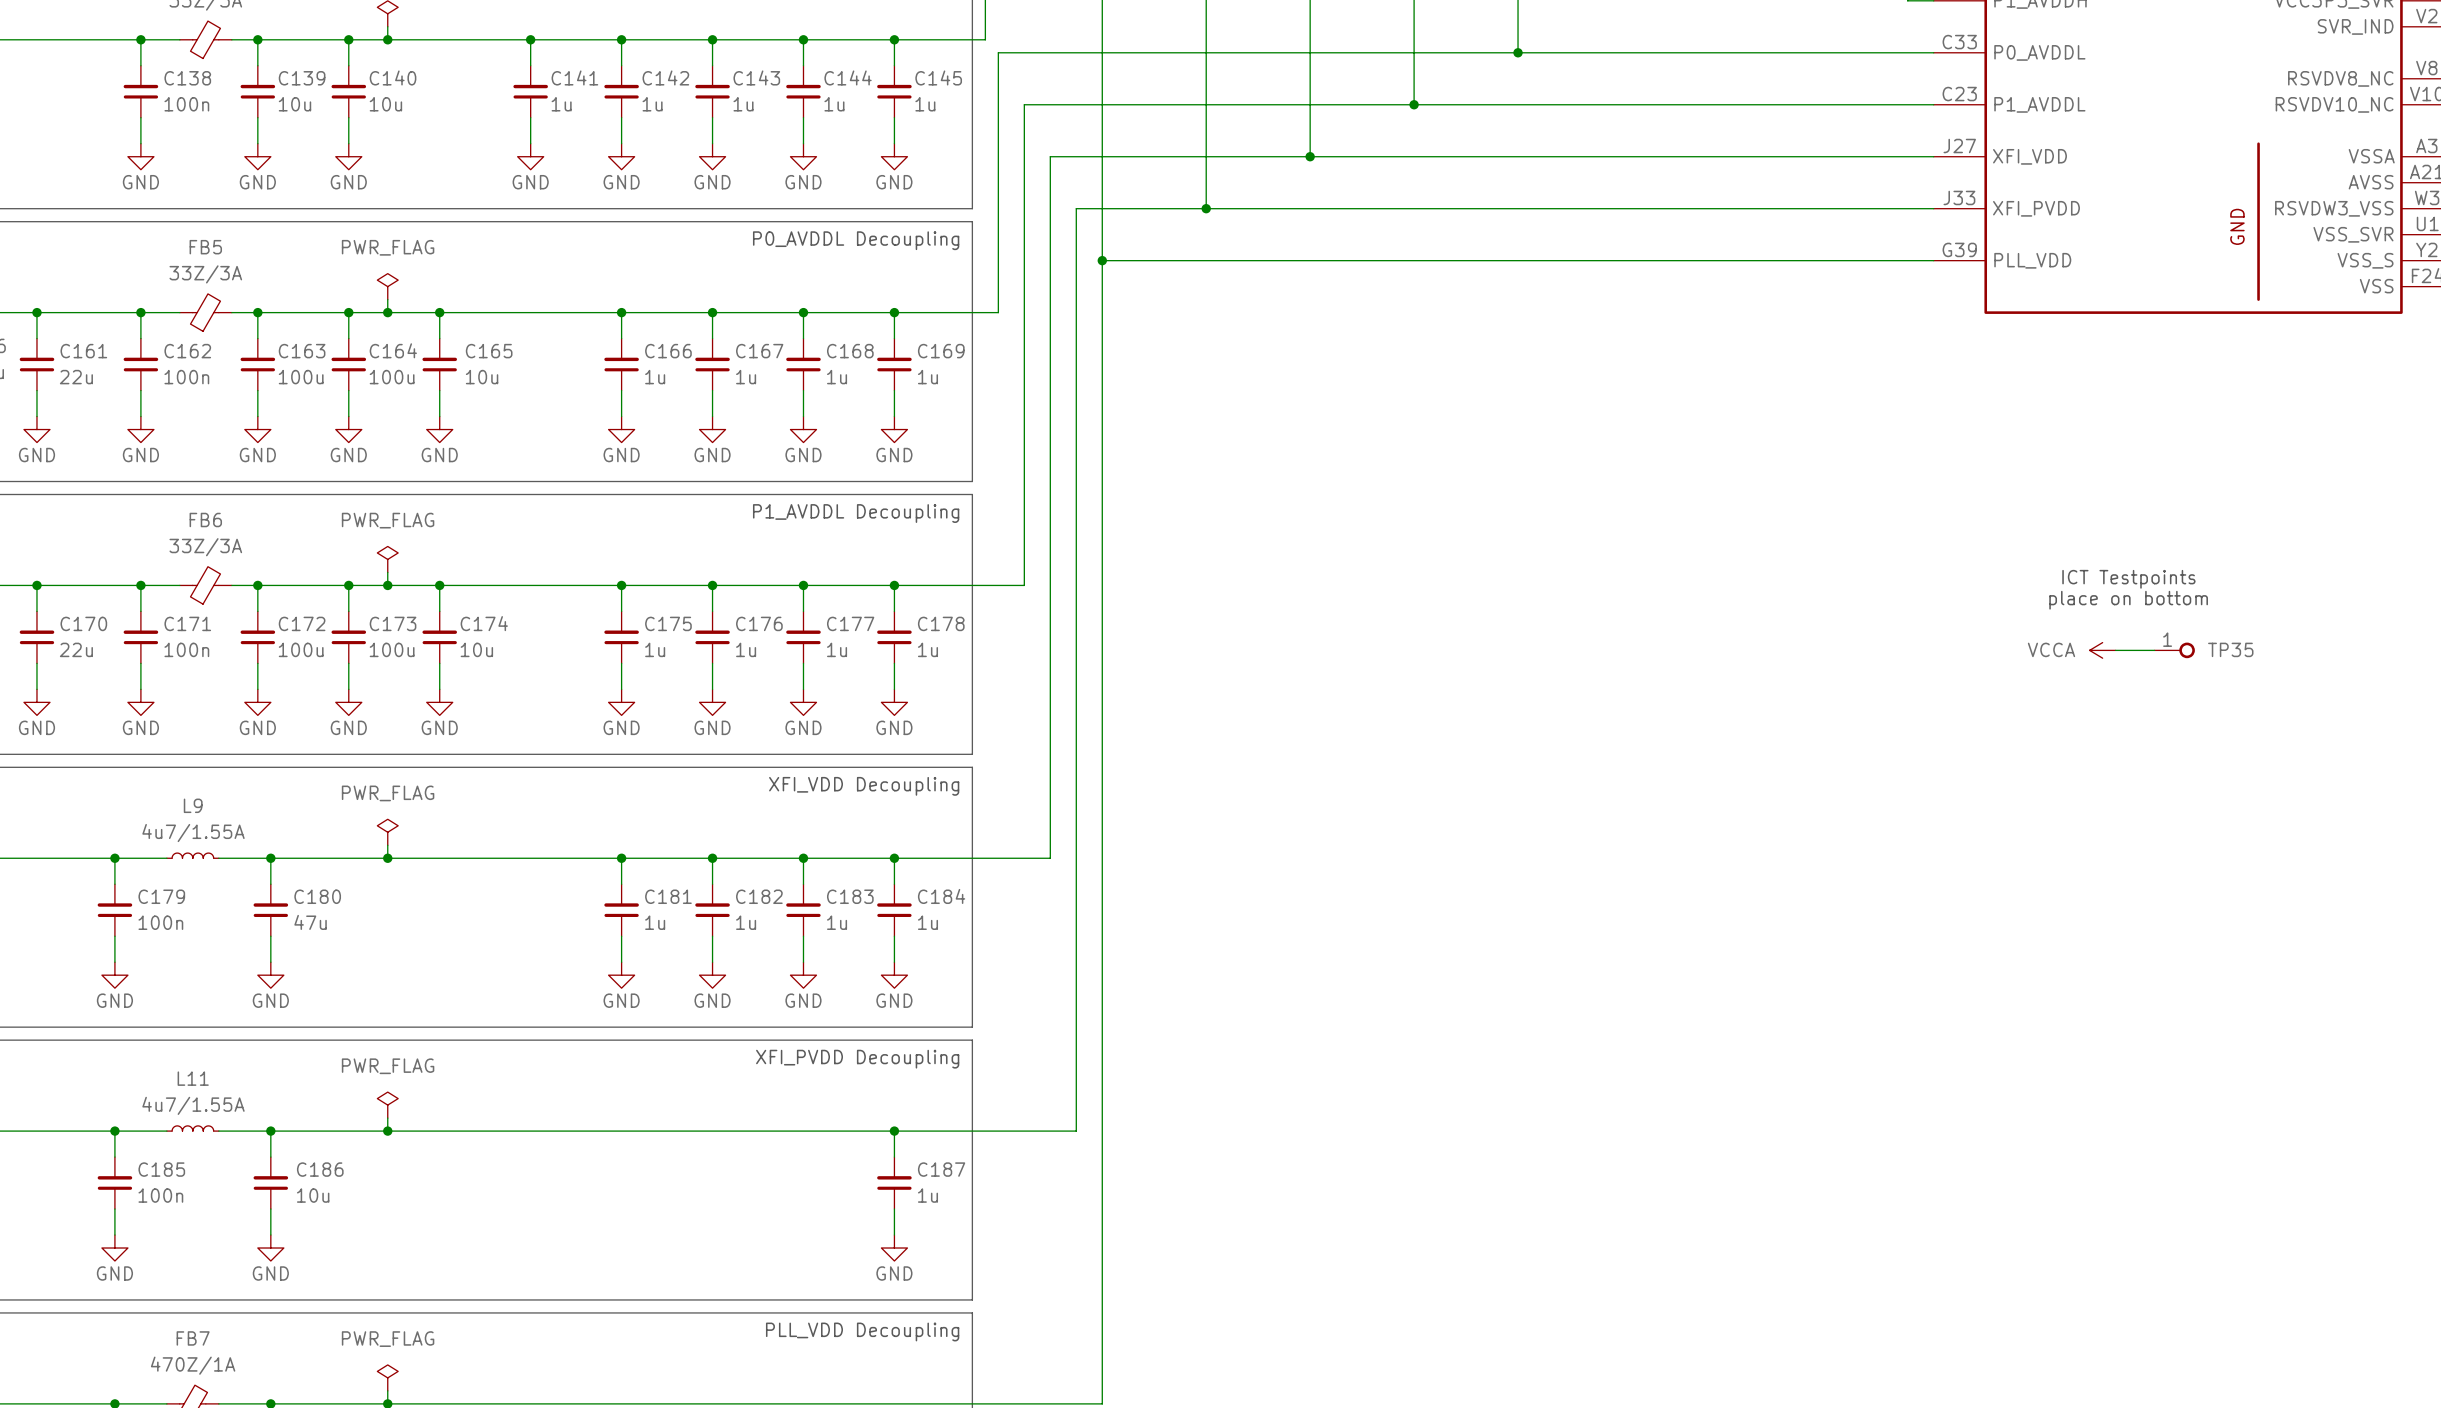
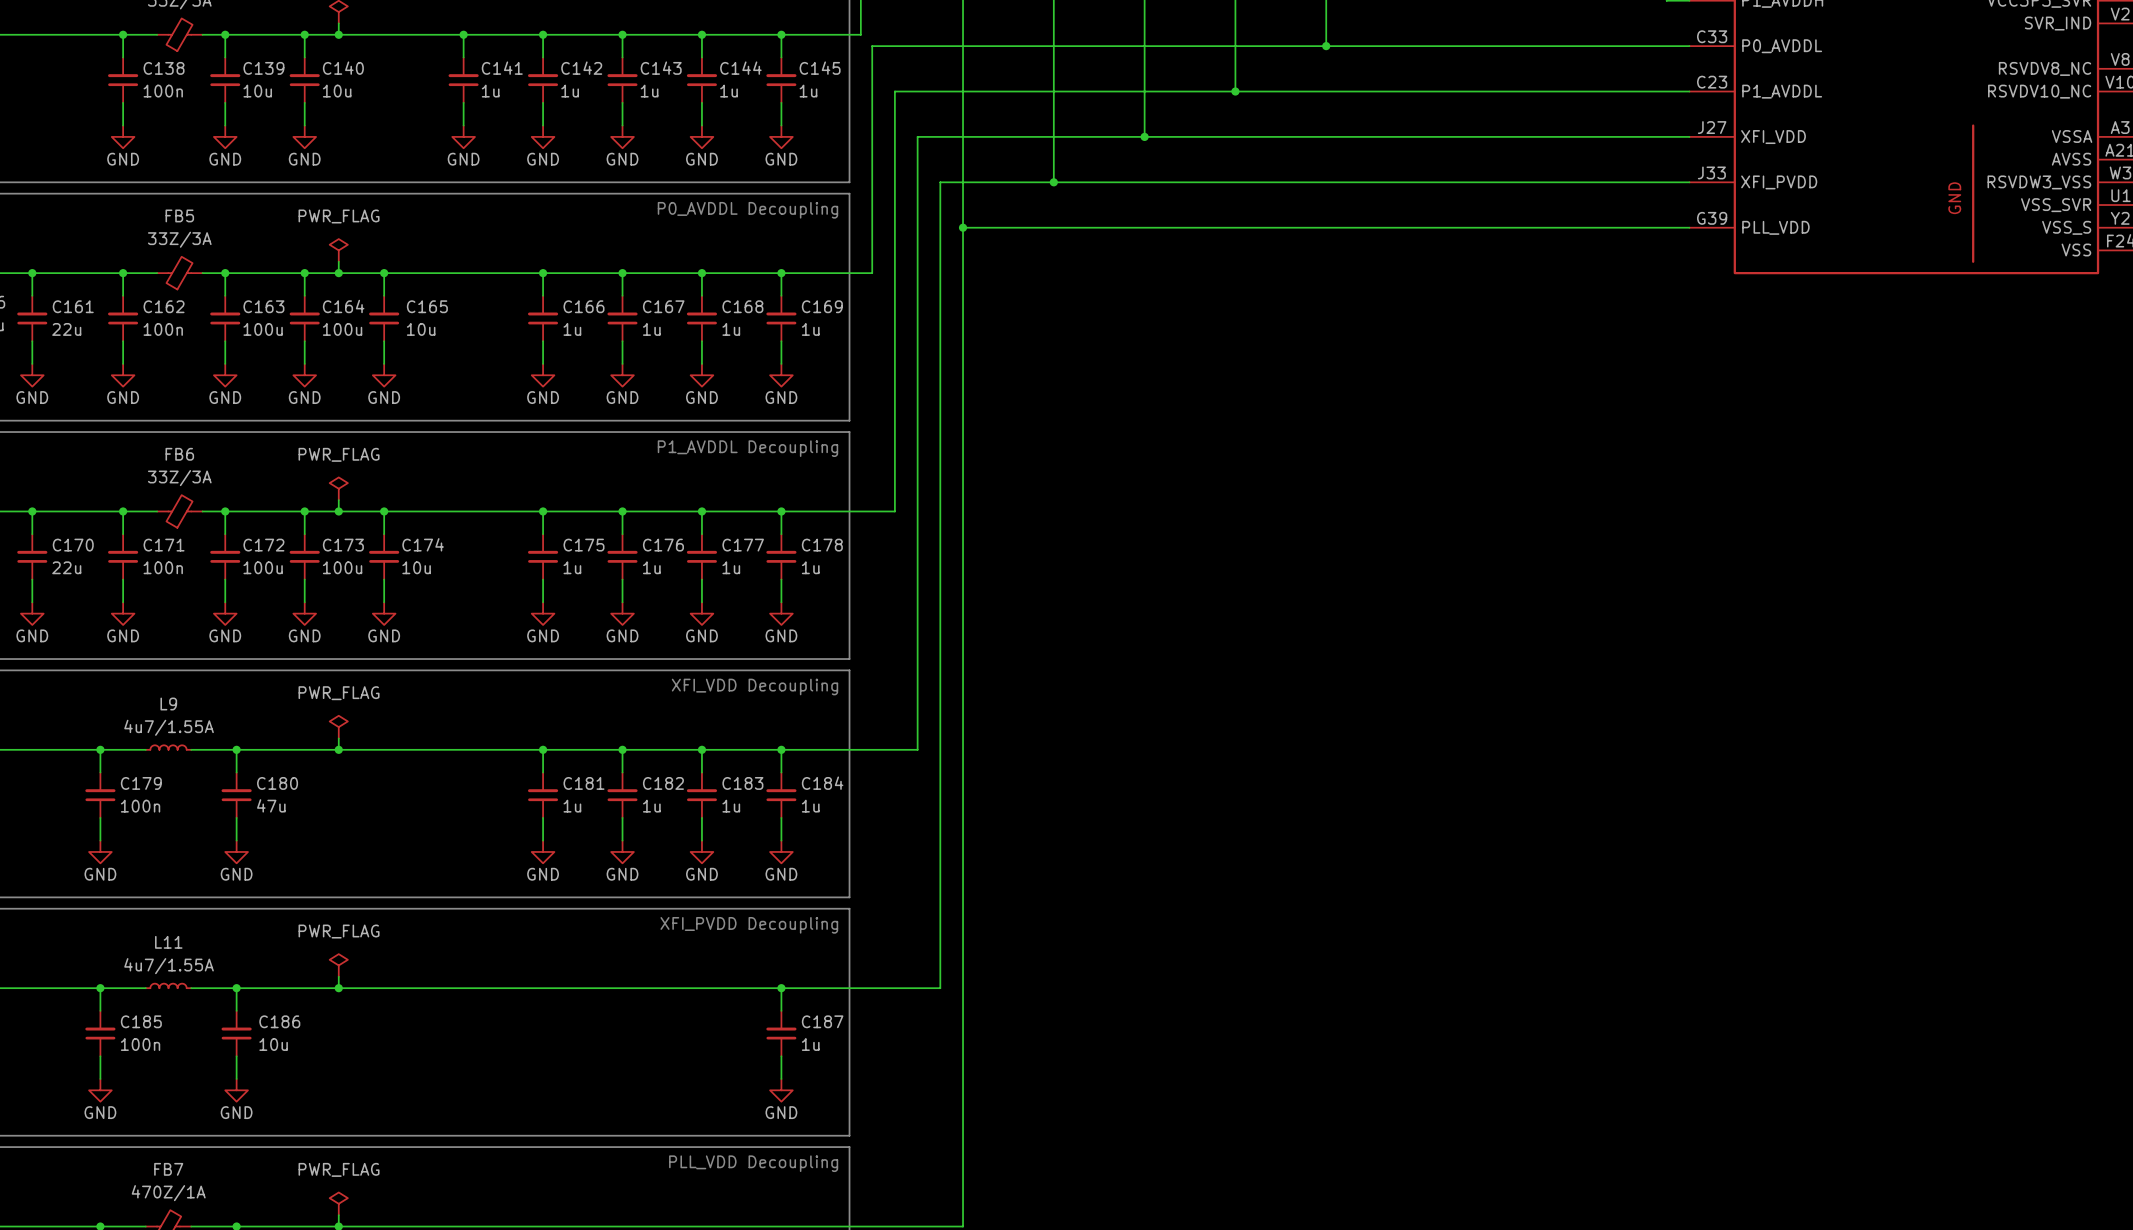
text: ICT Testpoints (2128, 579) -> none
text: place on bottom (2128, 600) -> none
power symbol: VCCA (2102, 650) -> none
wire: (2115, 650) (2154, 650) -> none
TP35: (2174, 650) -> none

